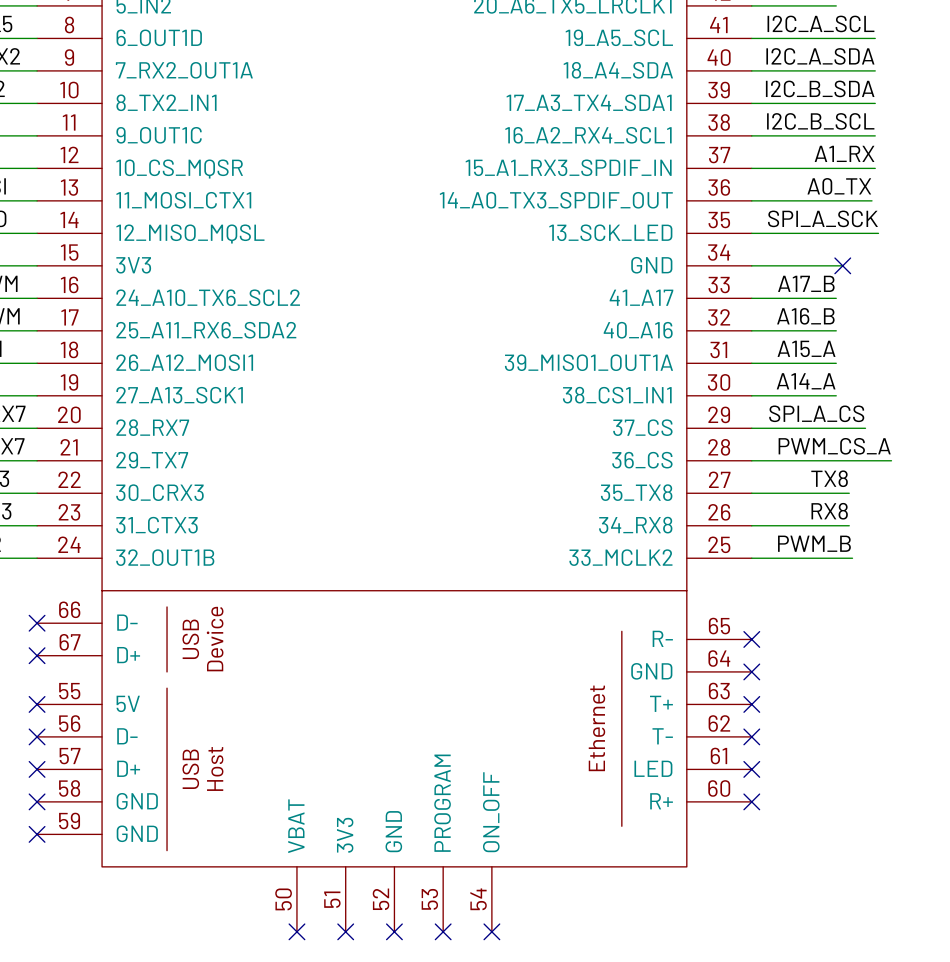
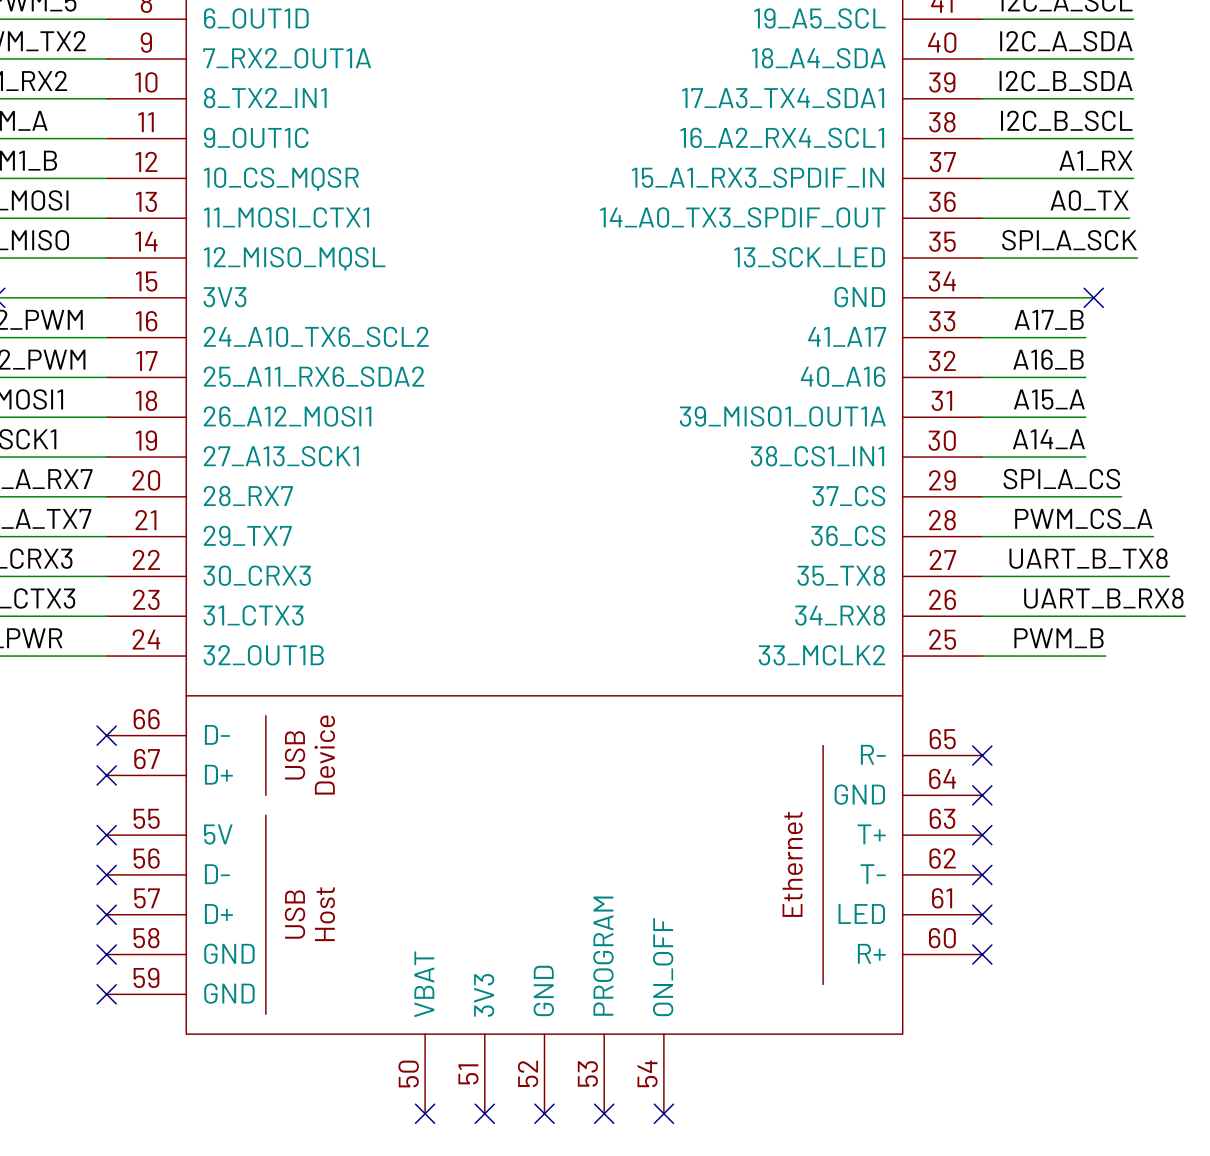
label: TX8 (829, 478) -> none
label: none -> UART_B_TX8 (1088, 558)
wire: none -> (1101, 576) (1169, 576)
label: RX8 (829, 511) -> none
label: none -> UART_B_RX8 (1103, 598)
wire: none -> (1101, 616) (1185, 616)

